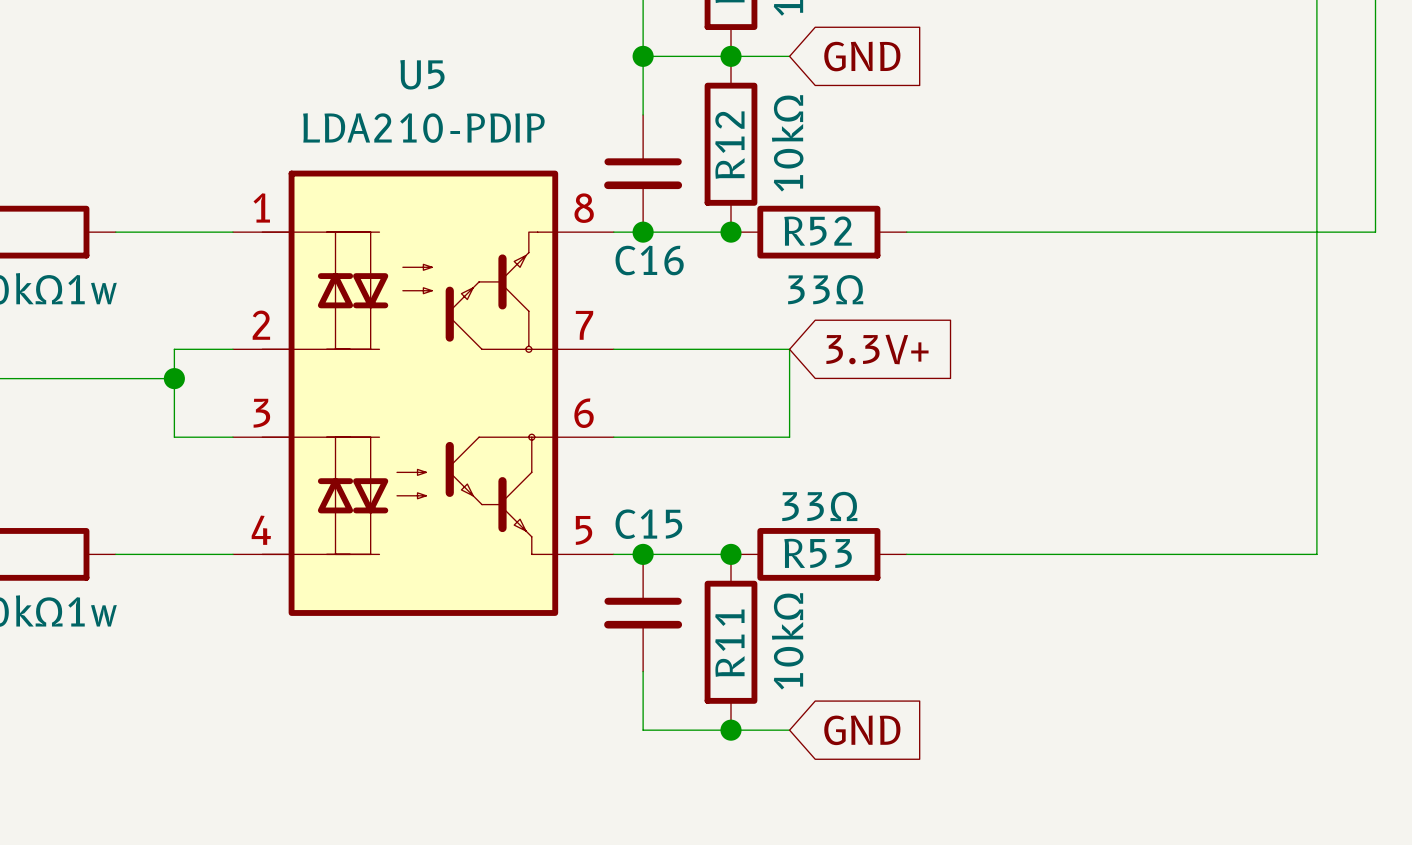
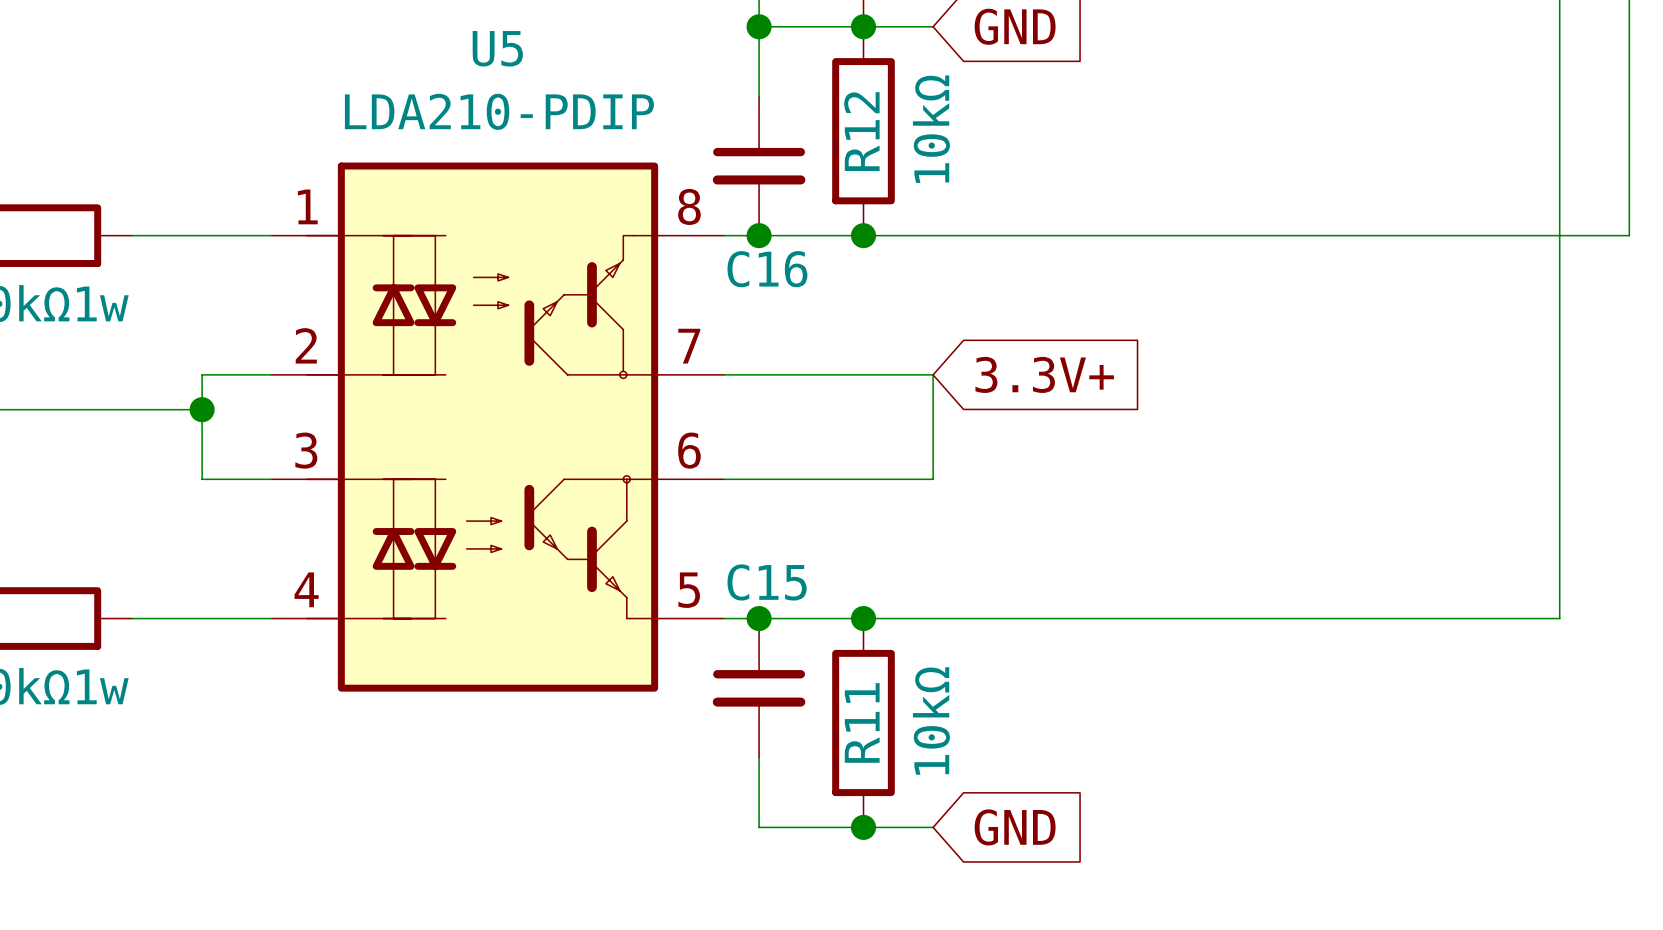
wire: none -> (863, 235) (1072, 235)
R52: 33Ω (818, 232) -> none
wire: none -> (863, 618) (1072, 618)
R53: 33Ω (818, 554) -> none

